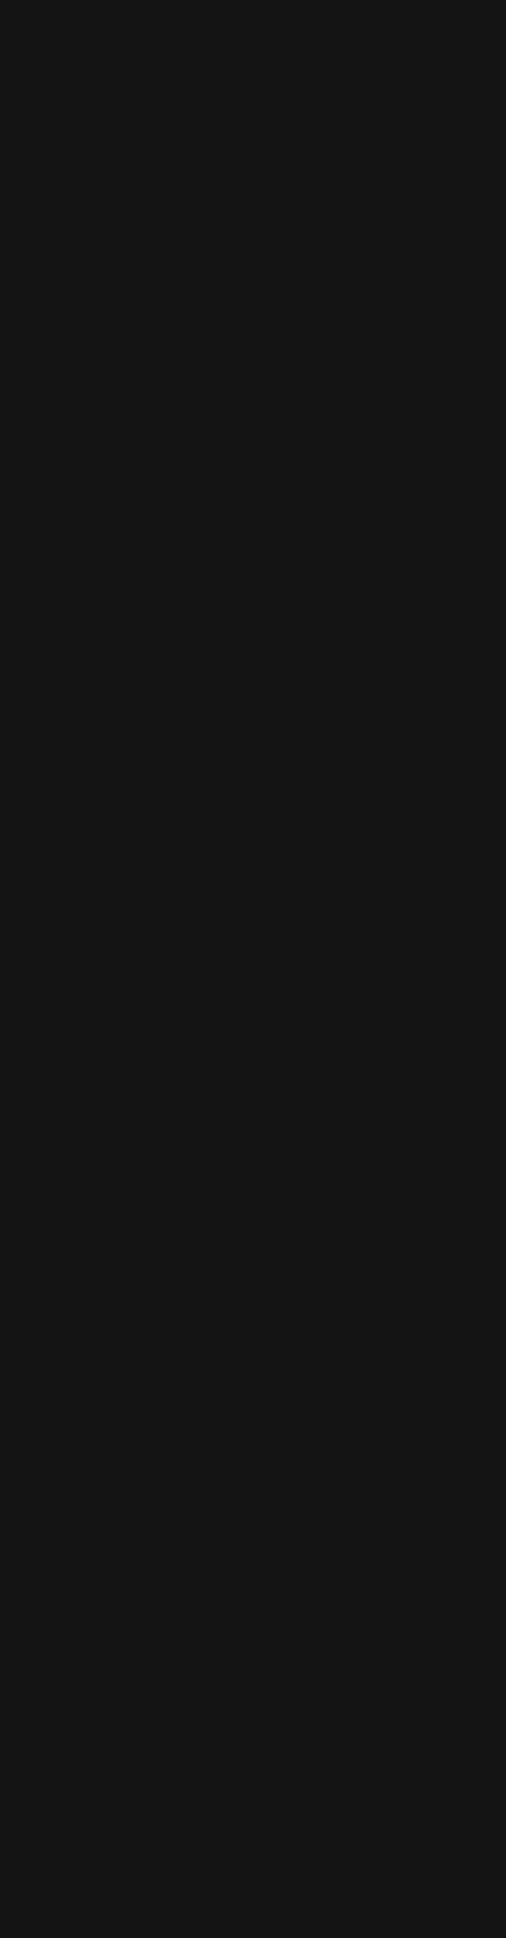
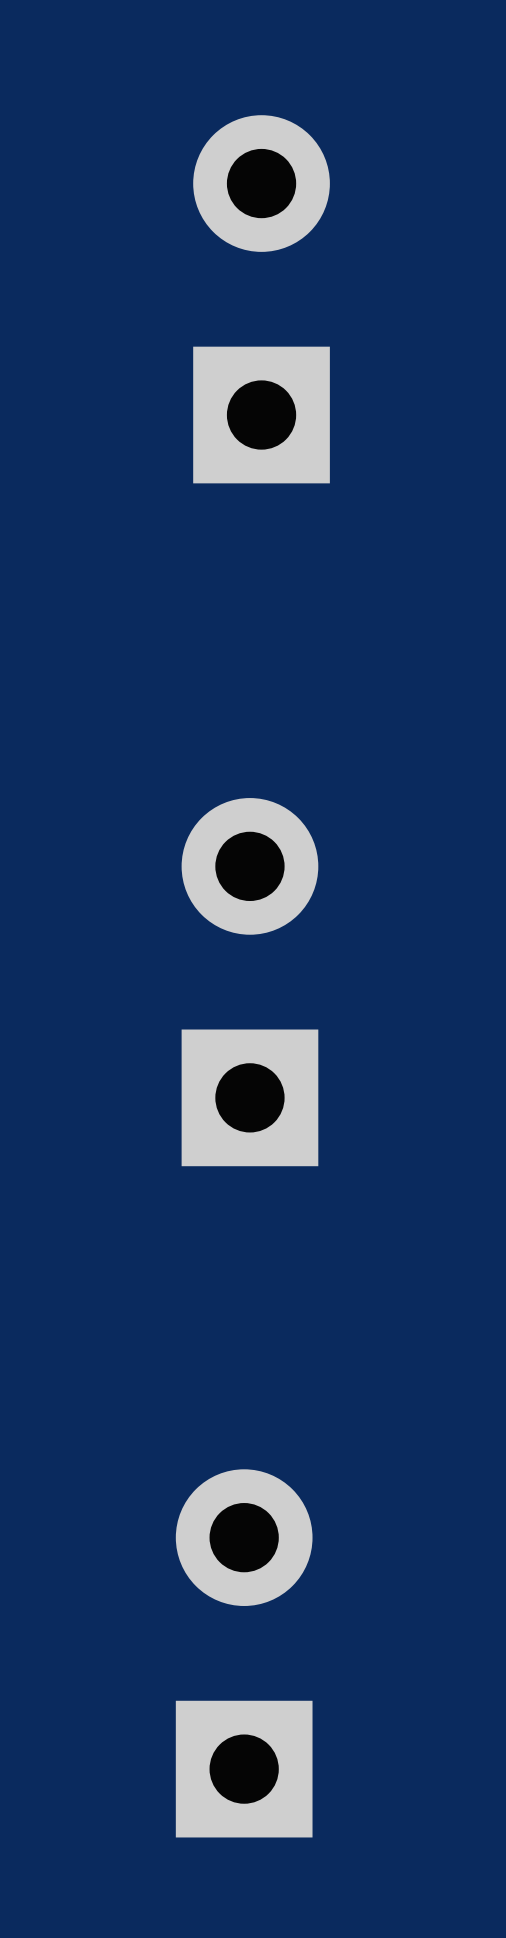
part: none -> (261, 299)
part: none -> (249, 982)
part: none -> (244, 1653)

